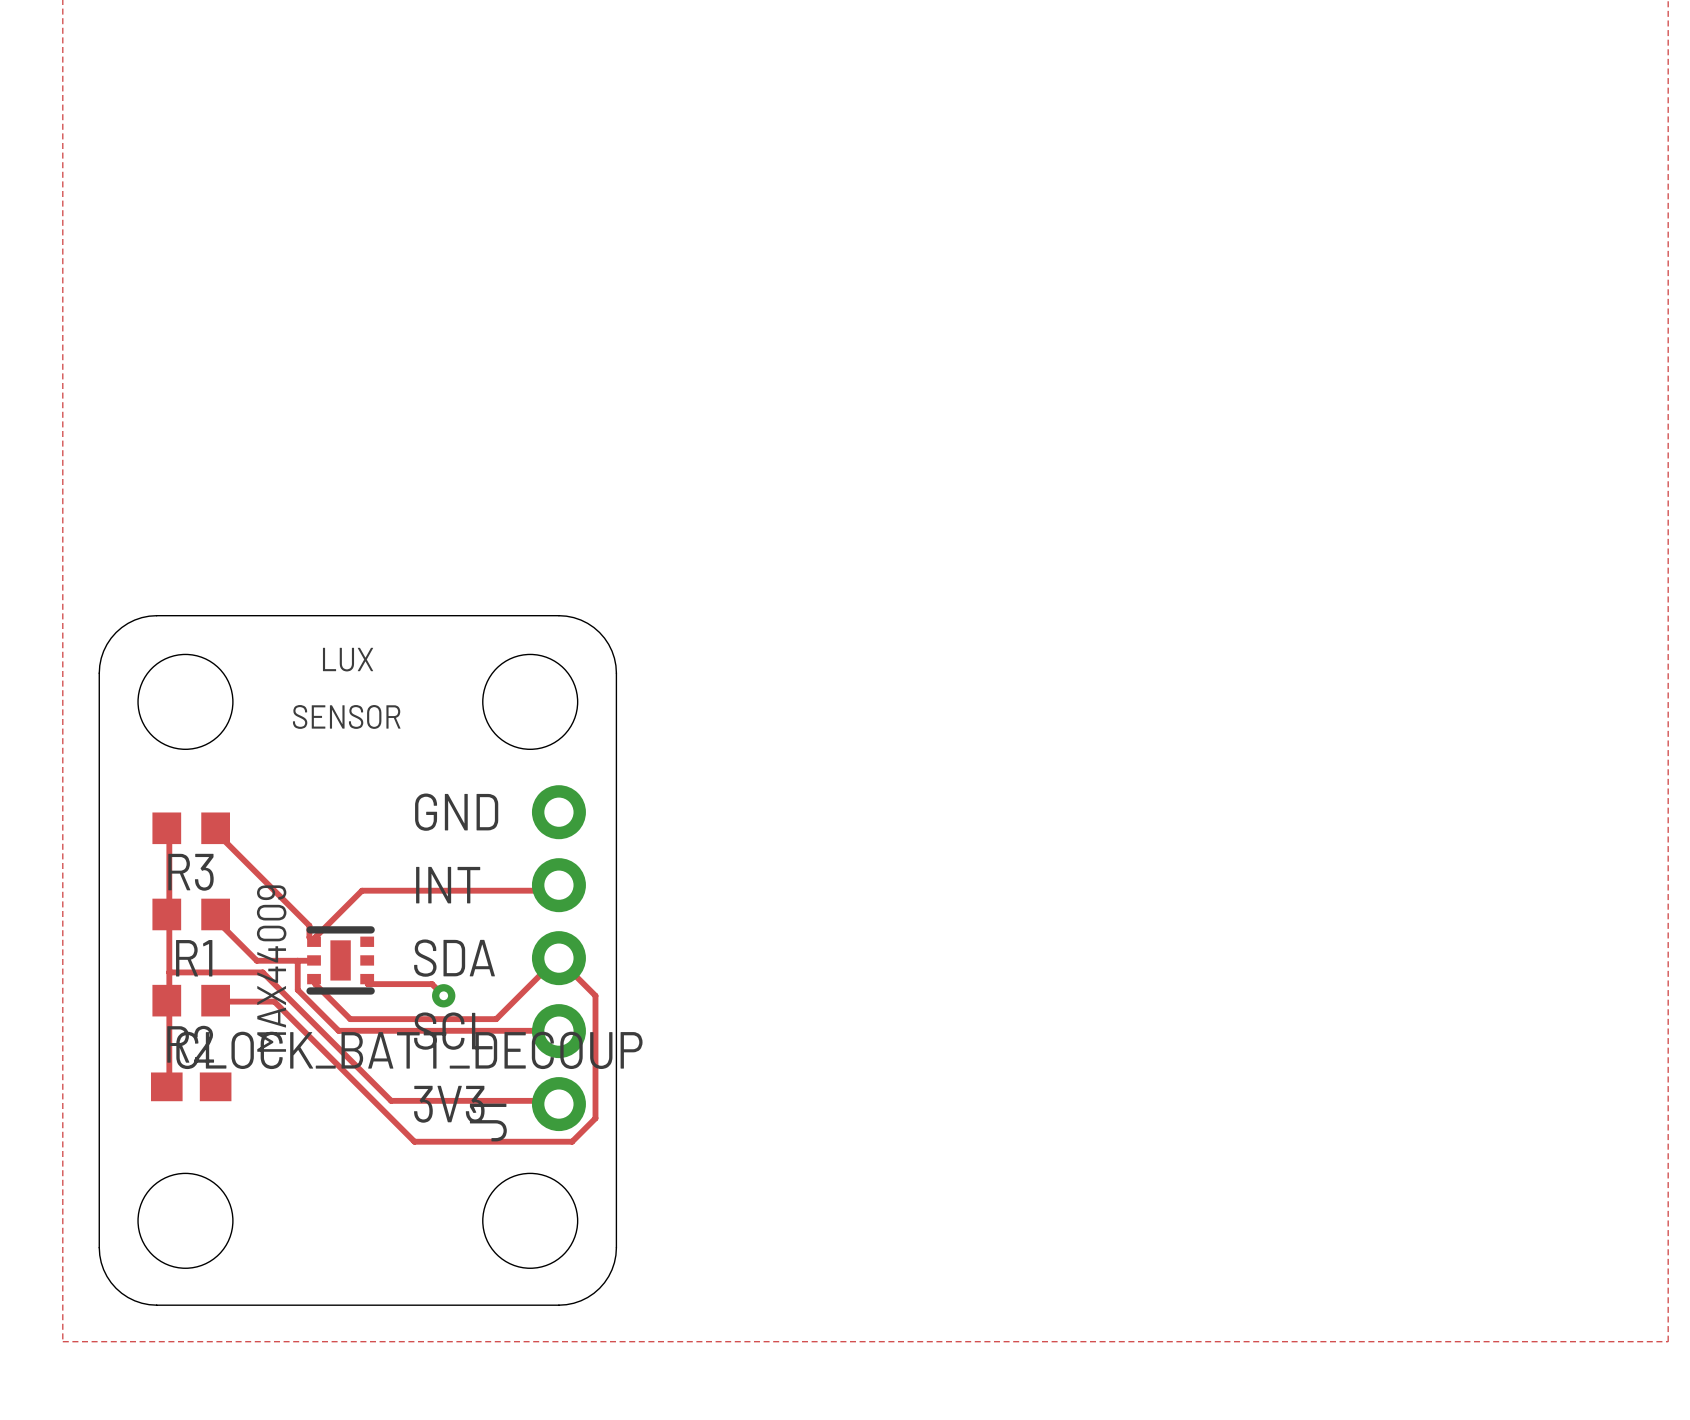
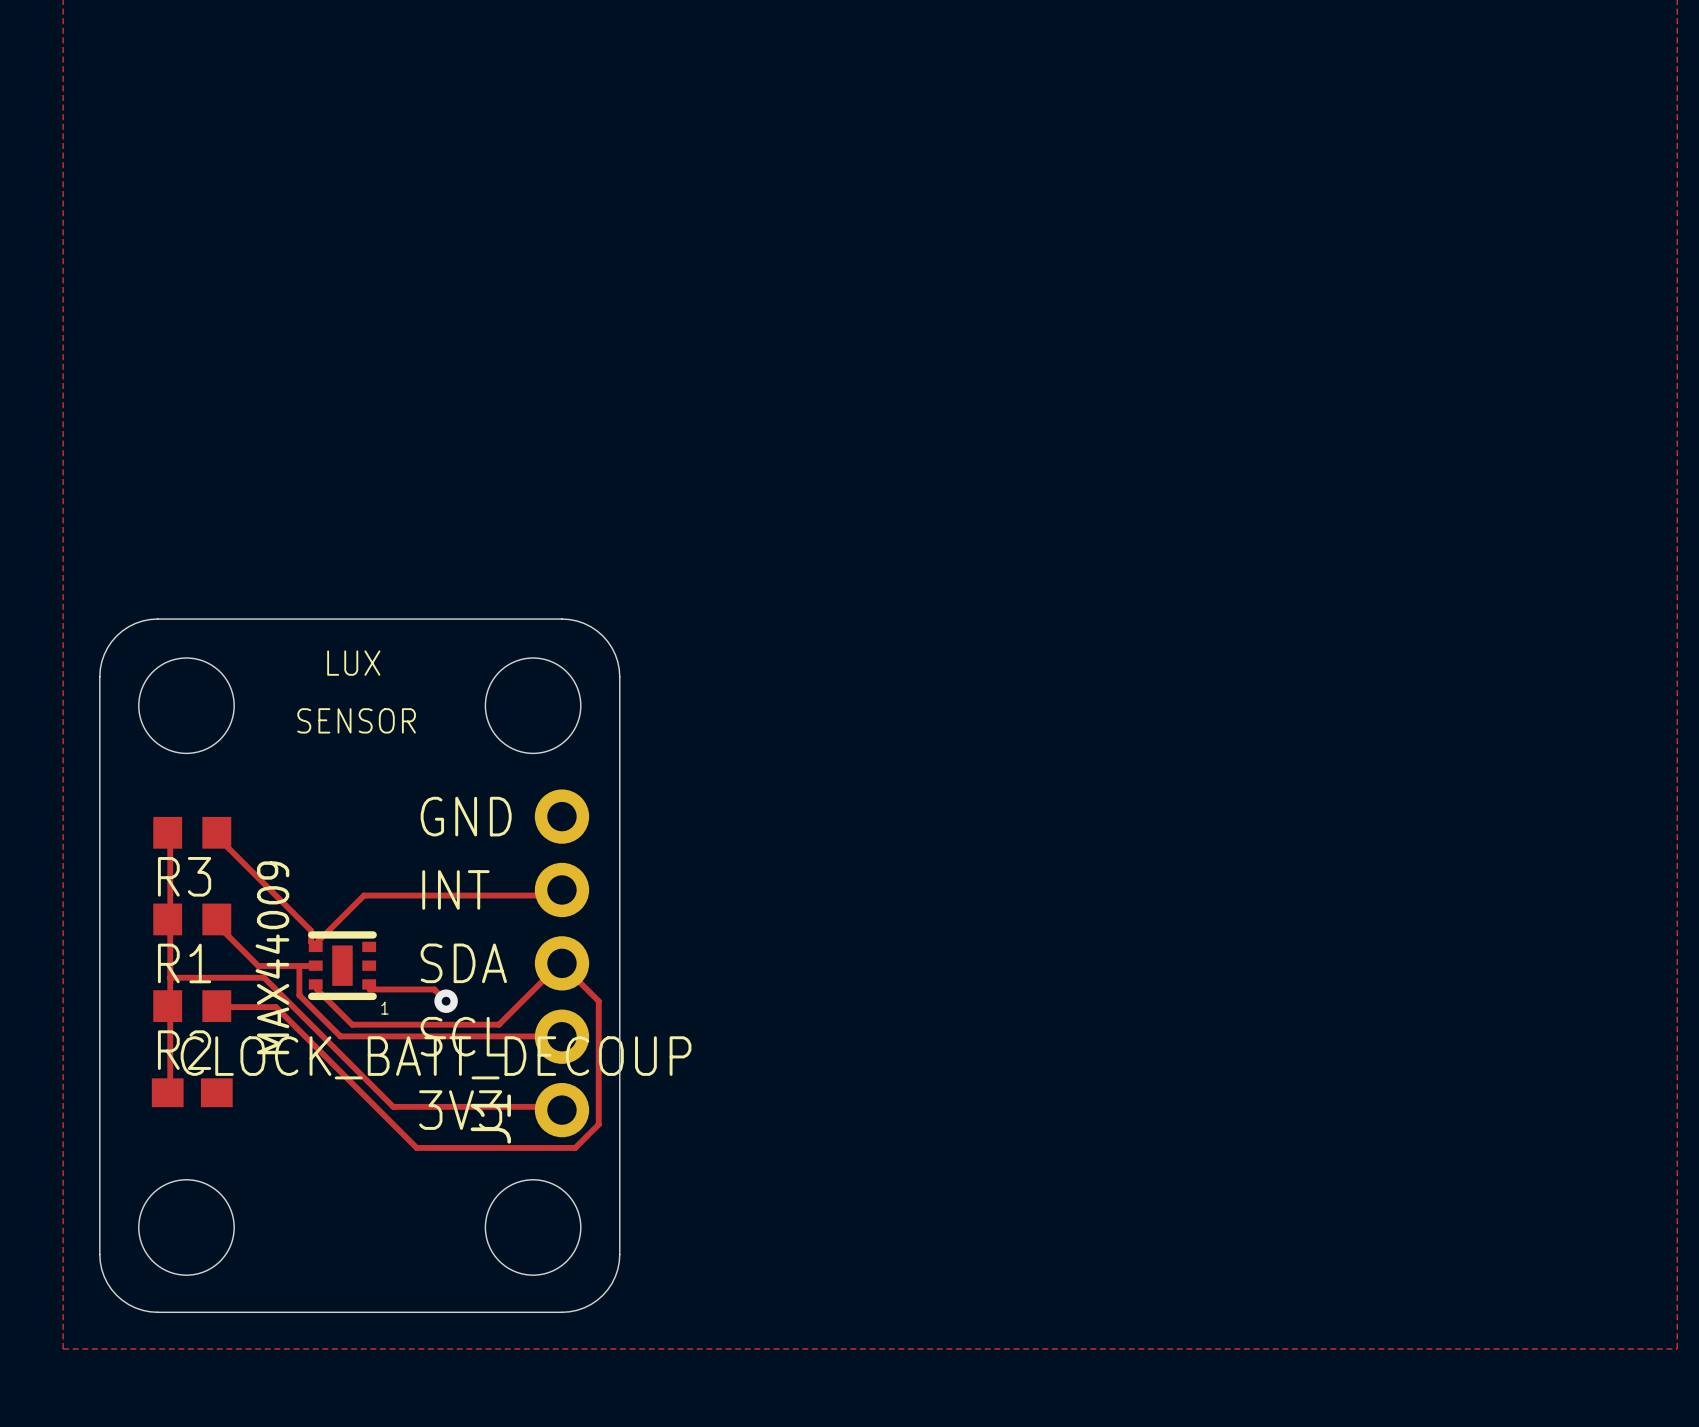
text: none -> 1 (384, 1008)

